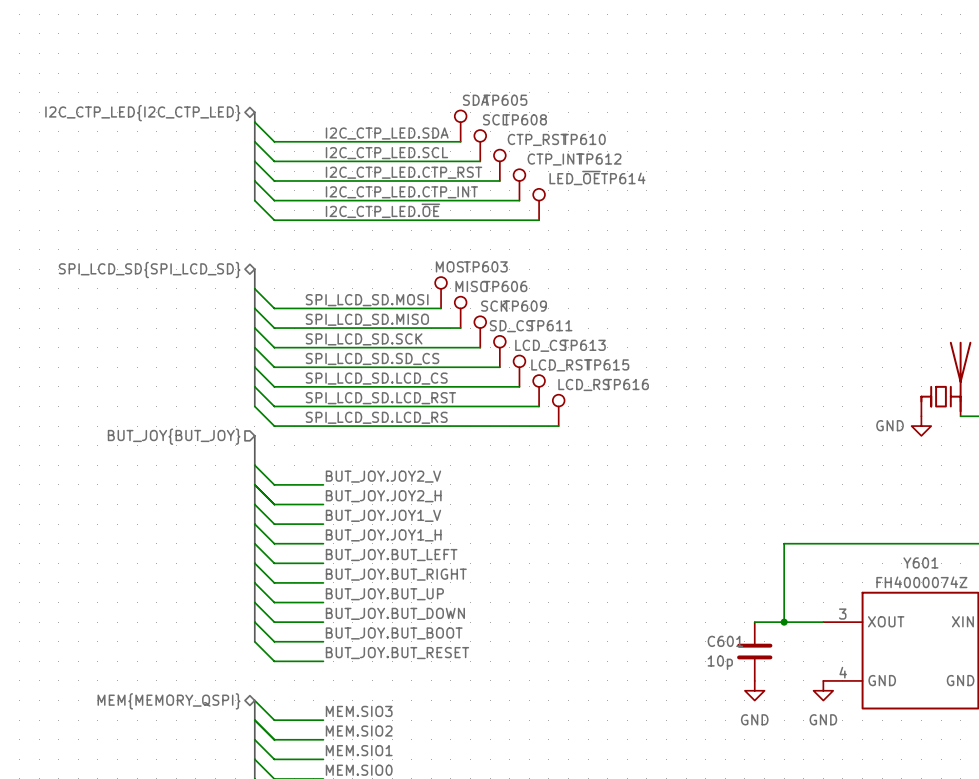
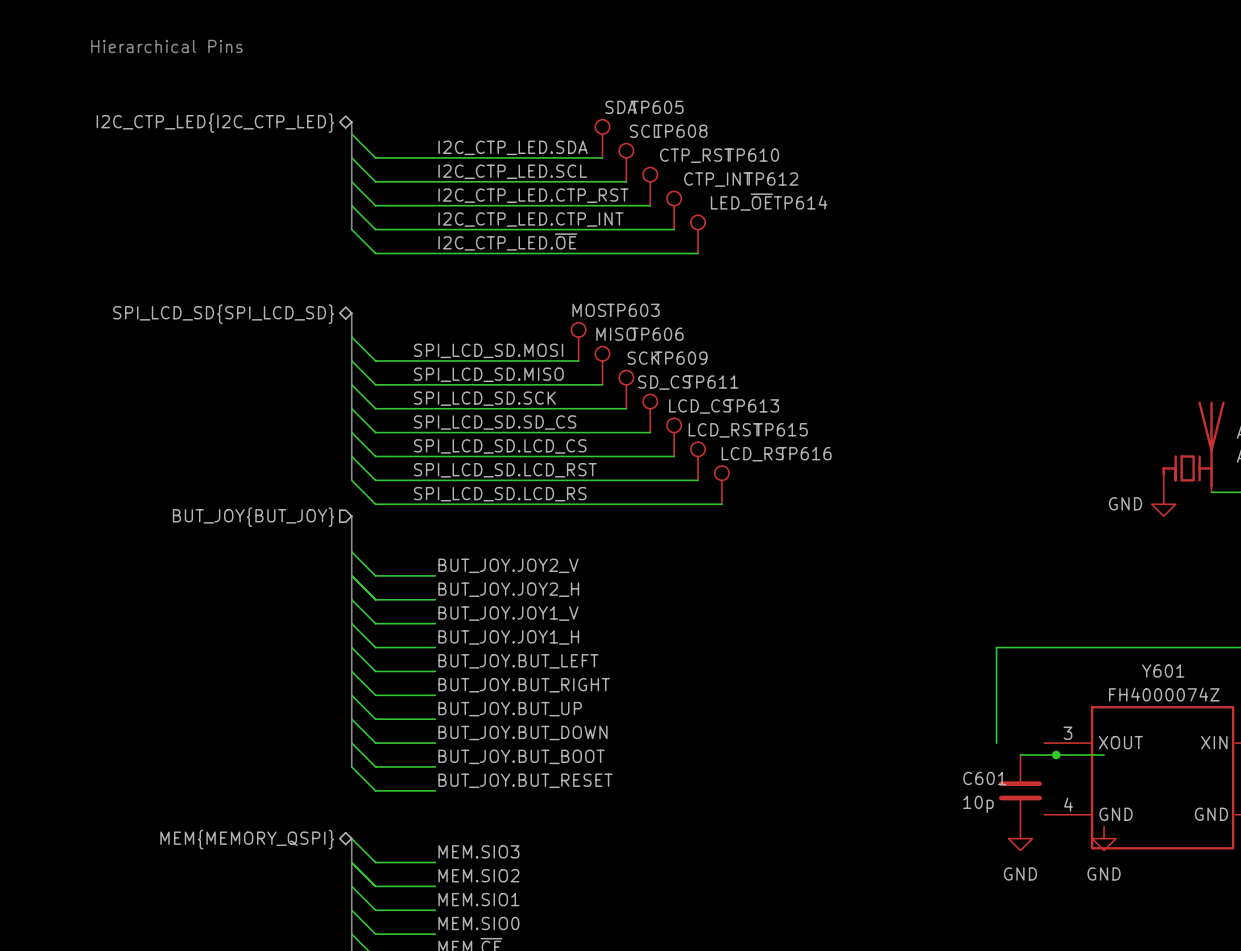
text: none -> Hierarchical Pins (166, 46)
wire: (754, 622) (823, 622) -> (1020, 755) (1104, 755)
junction: (784, 622) -> none
junction: none -> (1056, 755)
C601 position: (754, 651) -> (1020, 790)
power symbol: GND (754, 690) -> none
power symbol position: GND (823, 690) -> GND (1020, 838)
power symbol: none -> GND (1104, 838)

